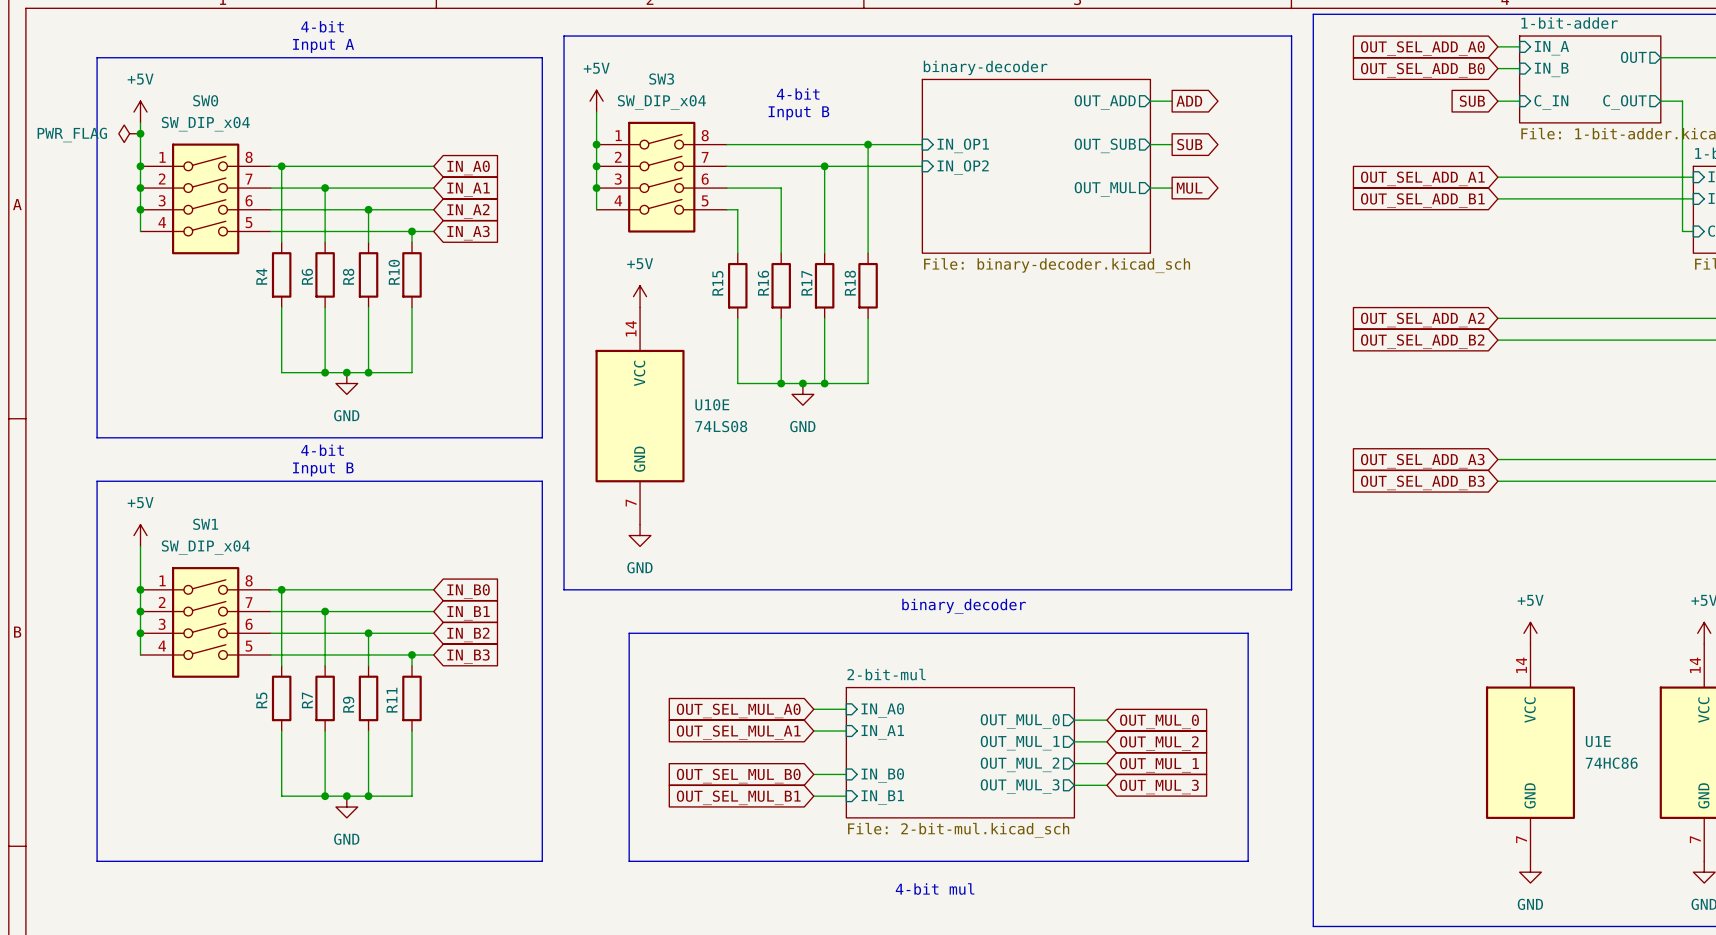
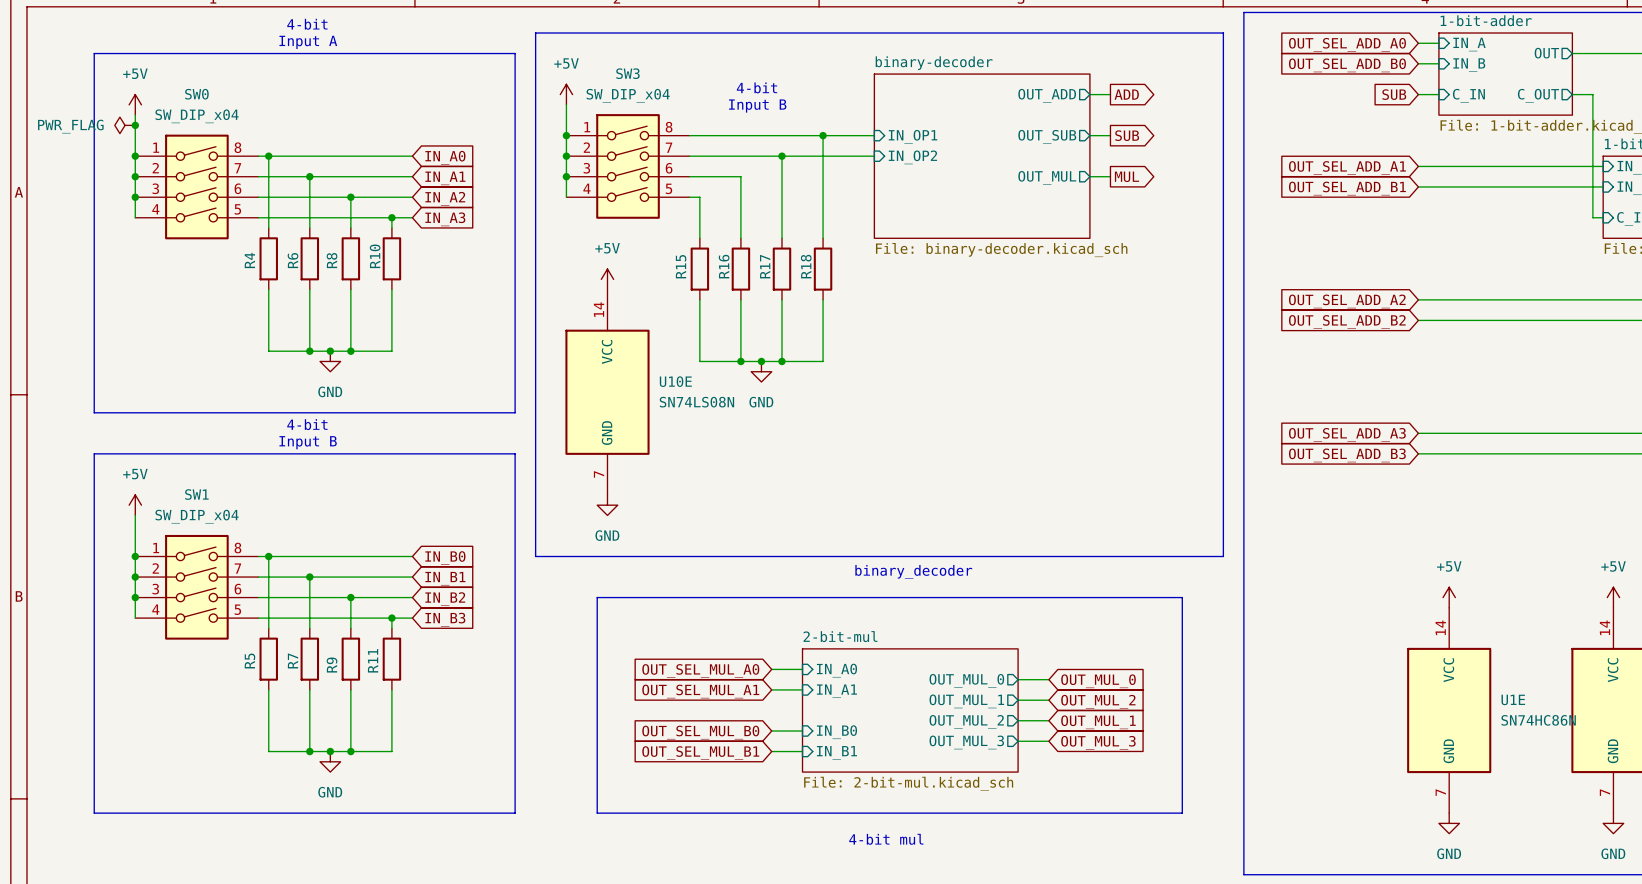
U10E value: 74LS08 (721, 426) -> SN74LS08N (696, 402)
U1E value: 74HC86 (1611, 763) -> SN74HC86N (1538, 720)

